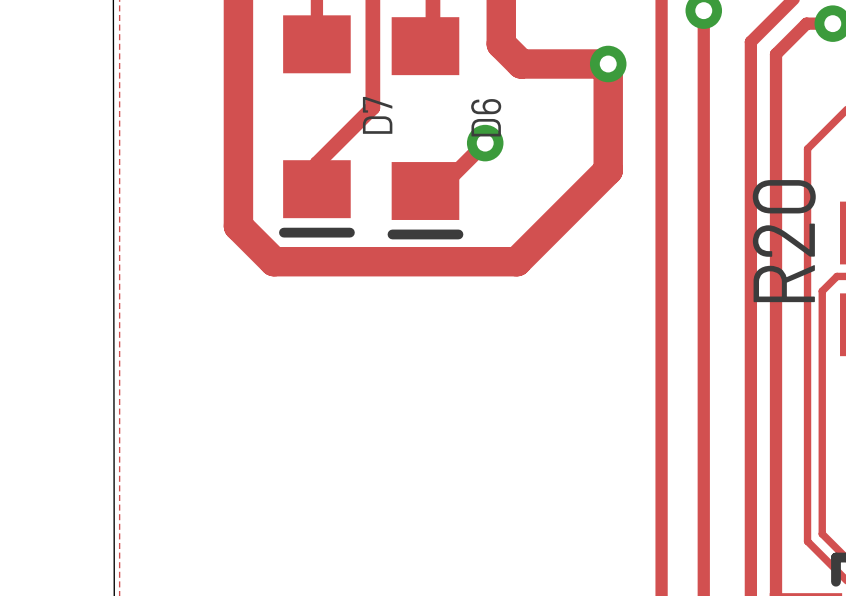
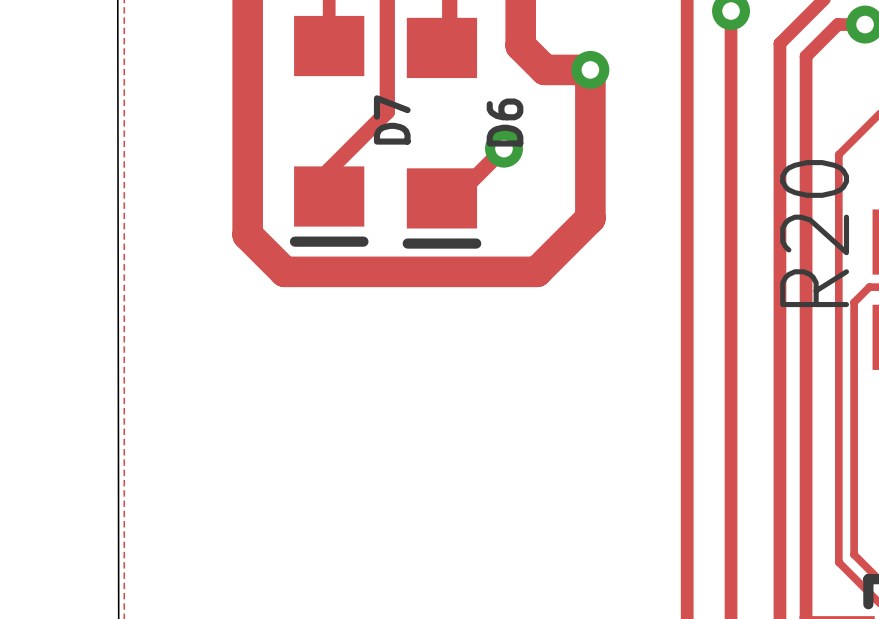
track: (521, 64) (608, 64) (608, 170) (568, 210) -> (541, 66) (544, 69) (590, 69) (590, 218)
via position: (608, 64) -> (590, 69)

